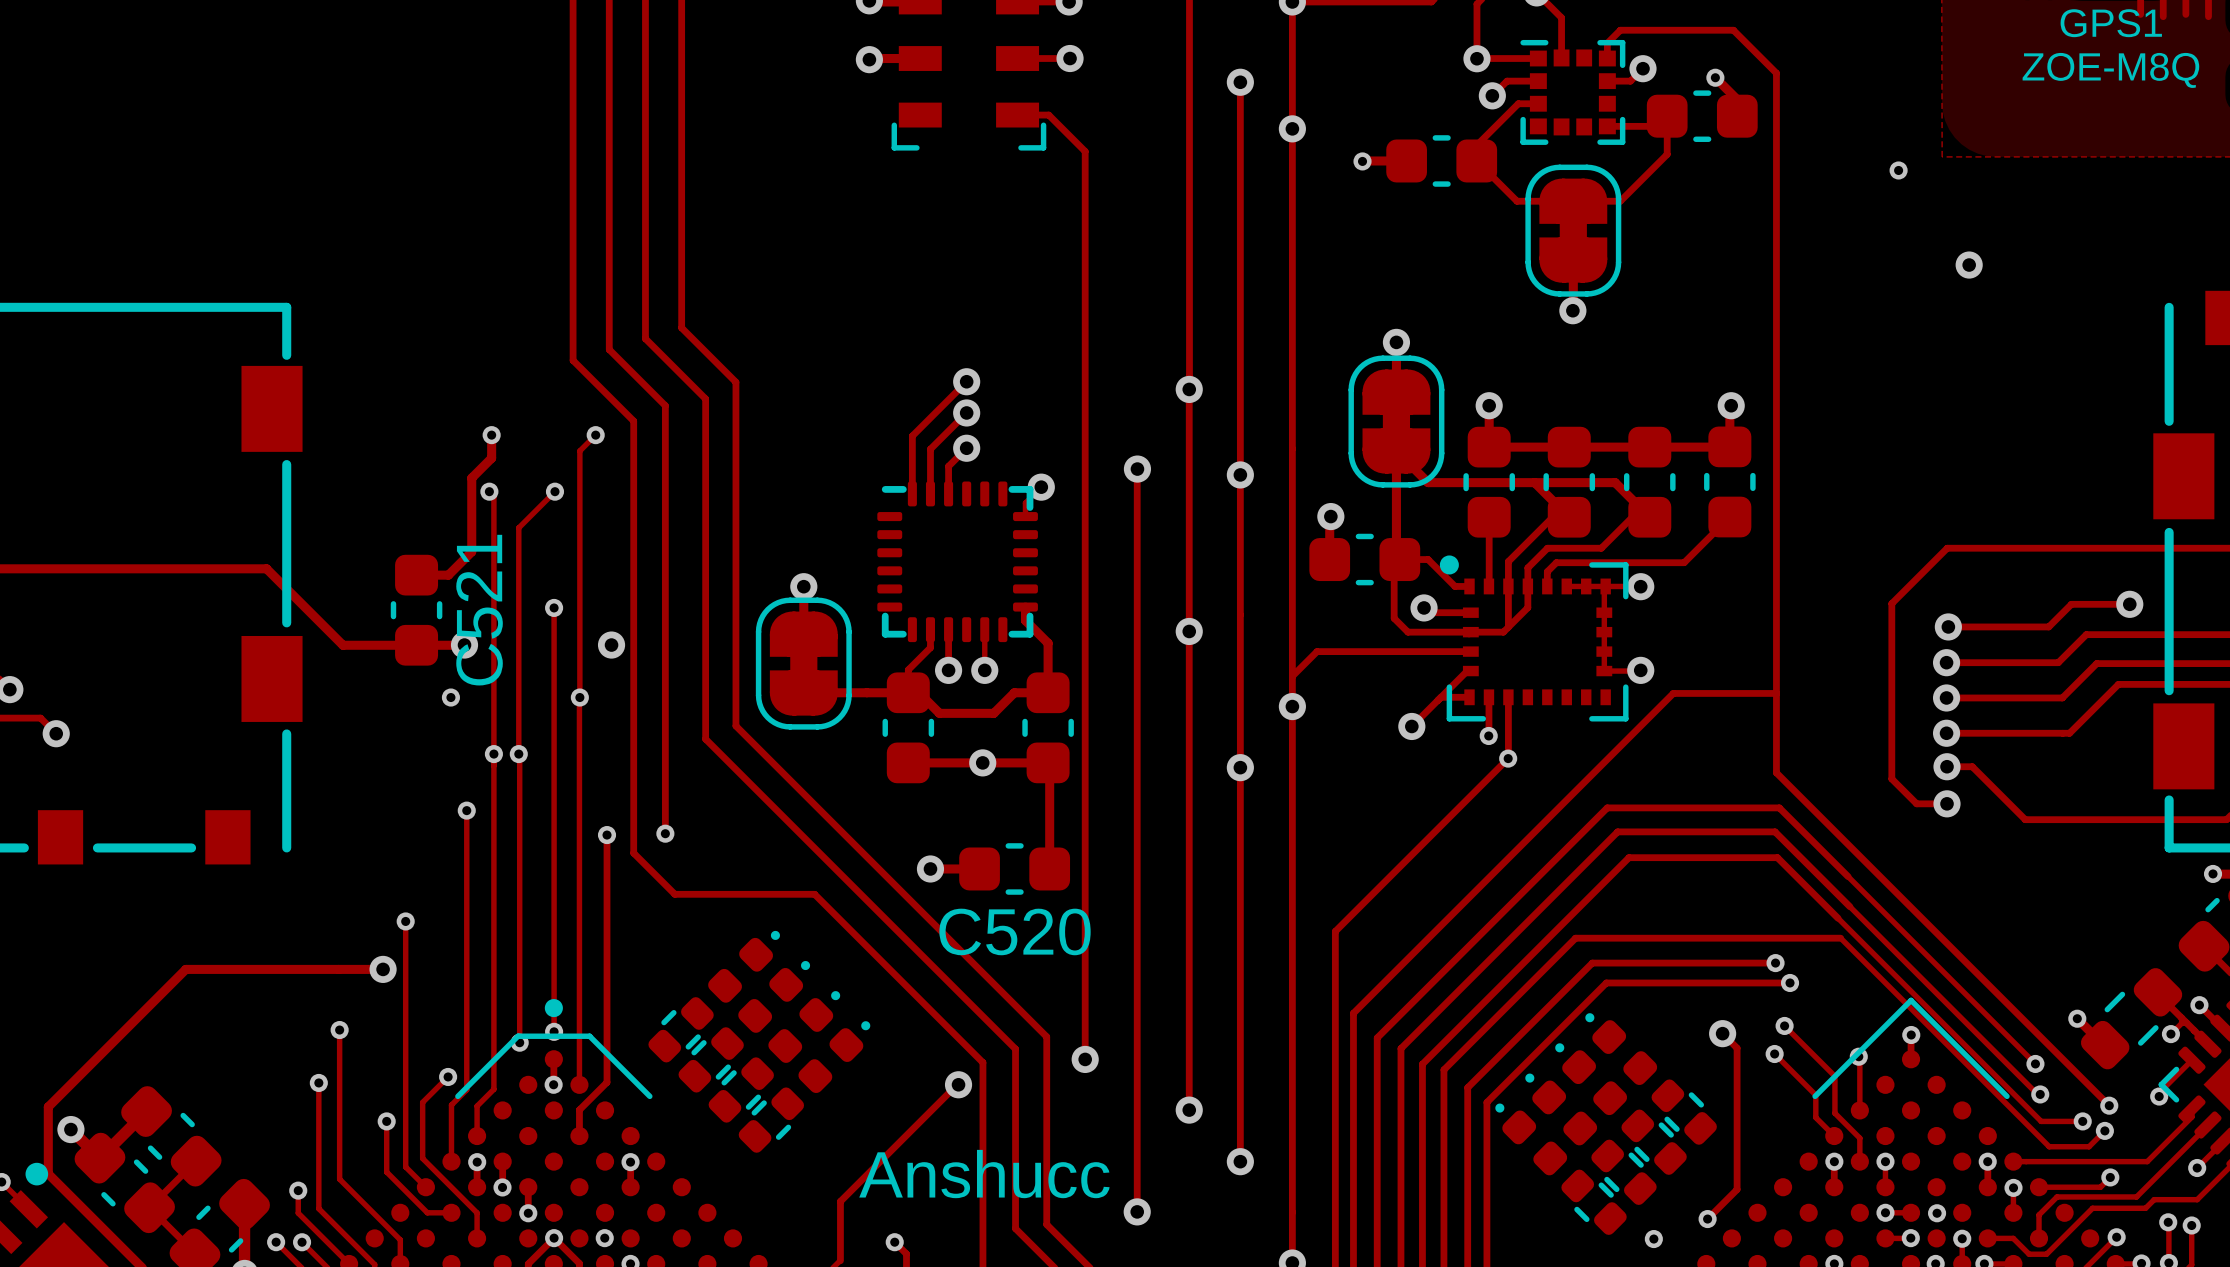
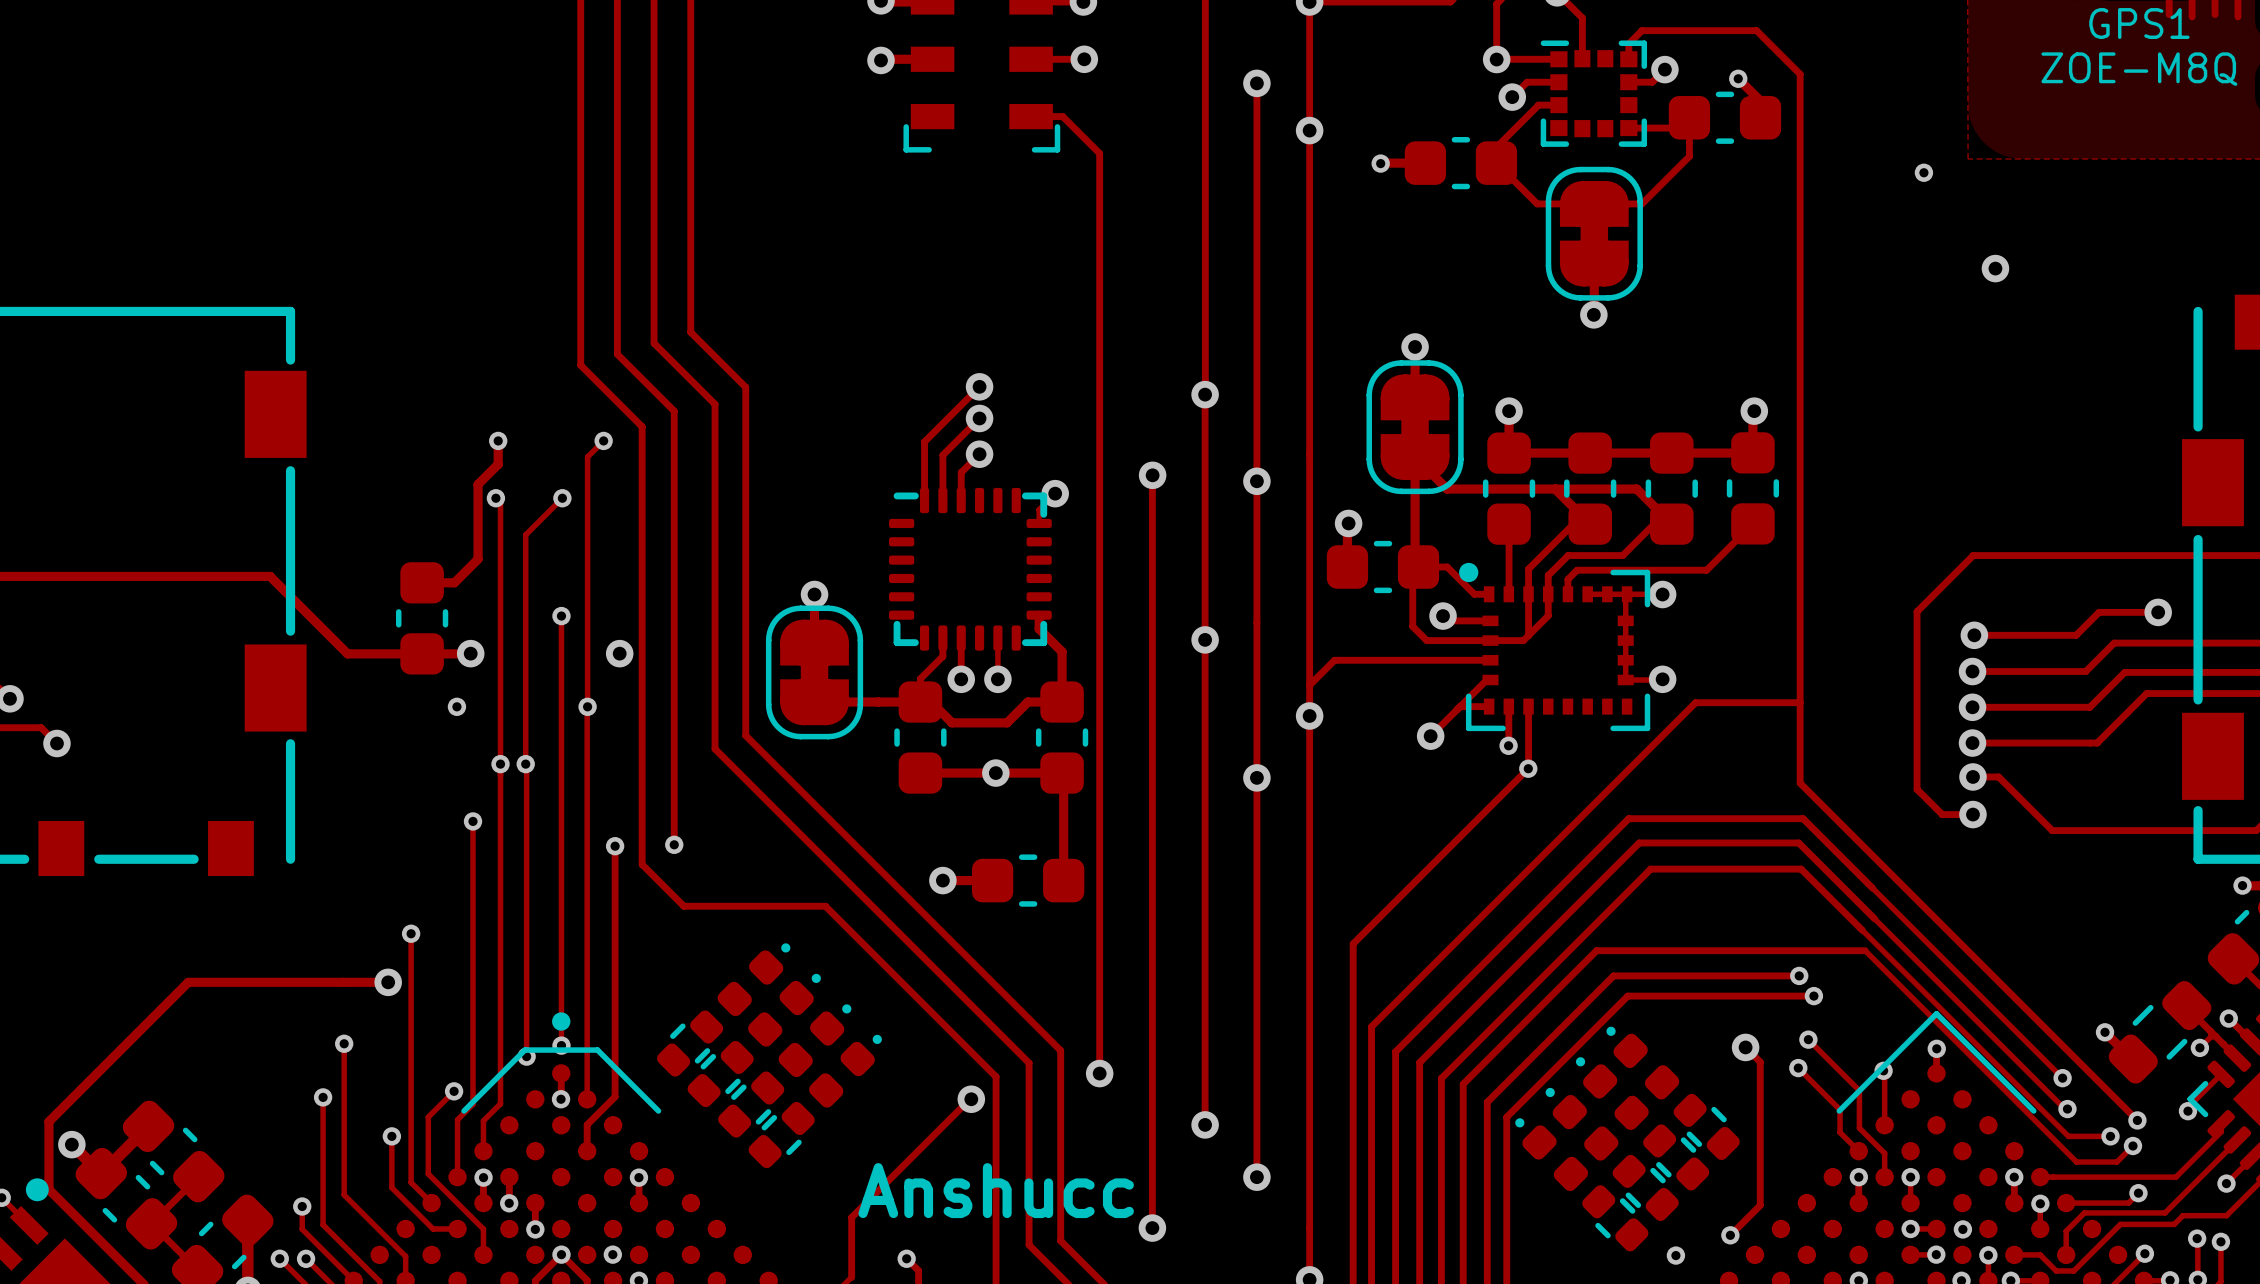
C521 name: C521 (479, 610) -> none
C520 name: C520 (1015, 931) -> none

